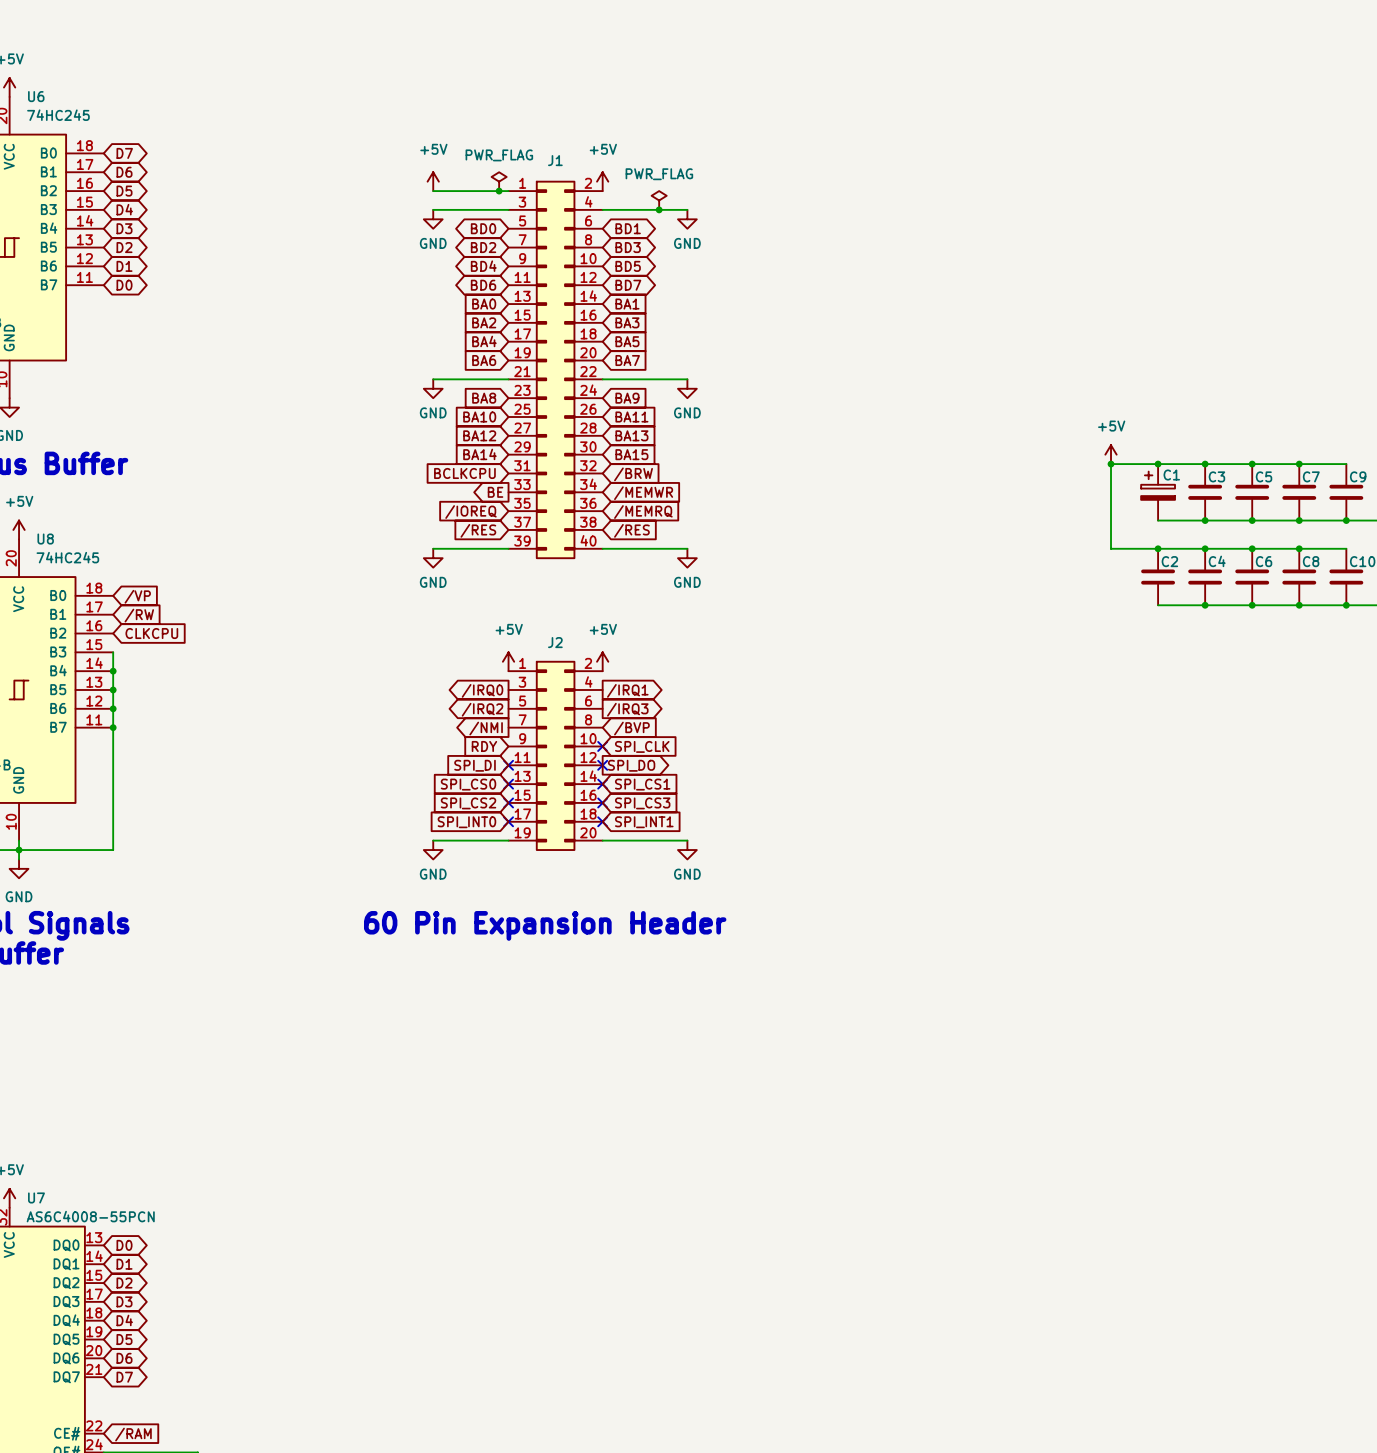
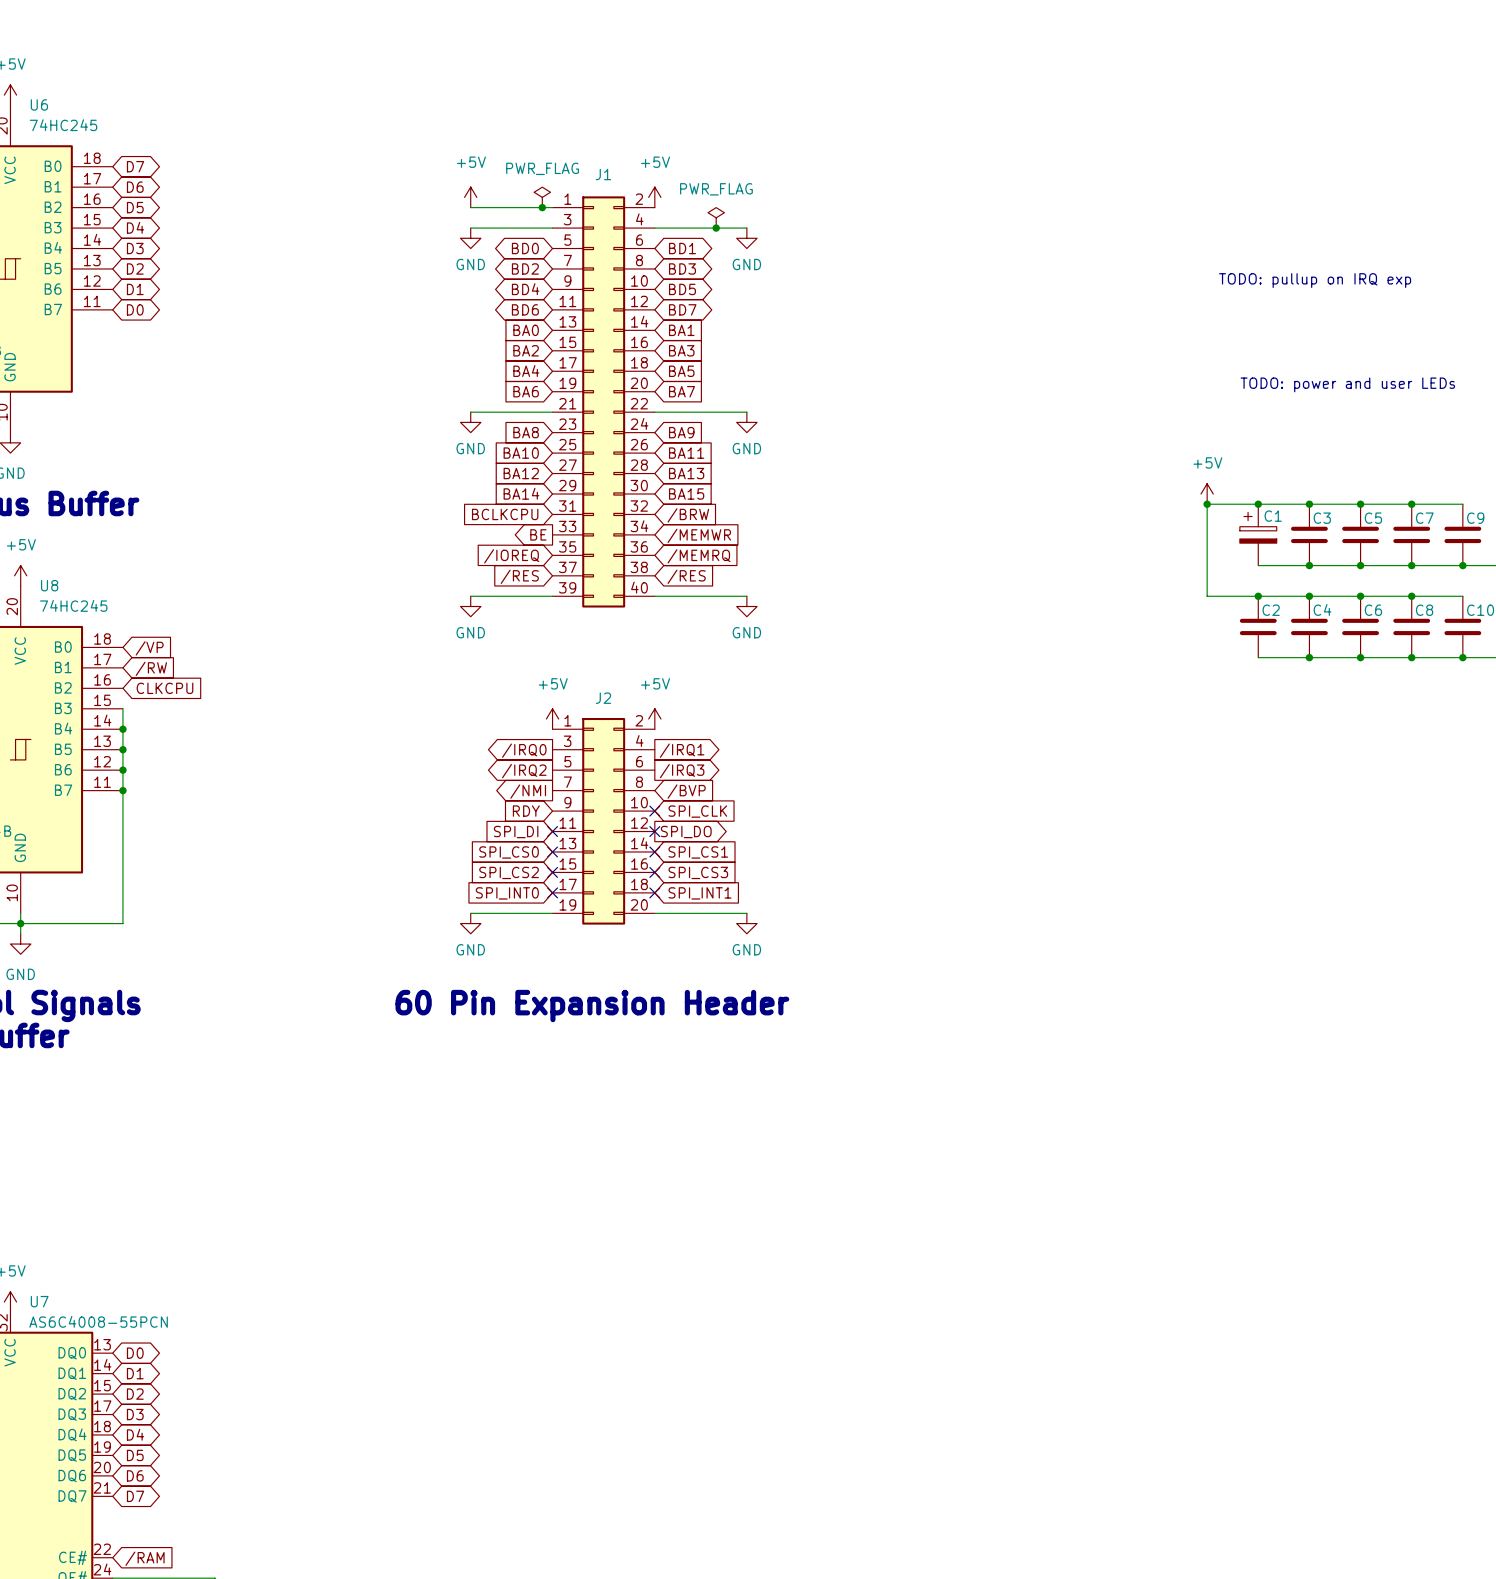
text: none -> TODO: pullup on IRQ exp (1315, 280)
text: none -> TODO: power and user LEDs (1347, 384)

